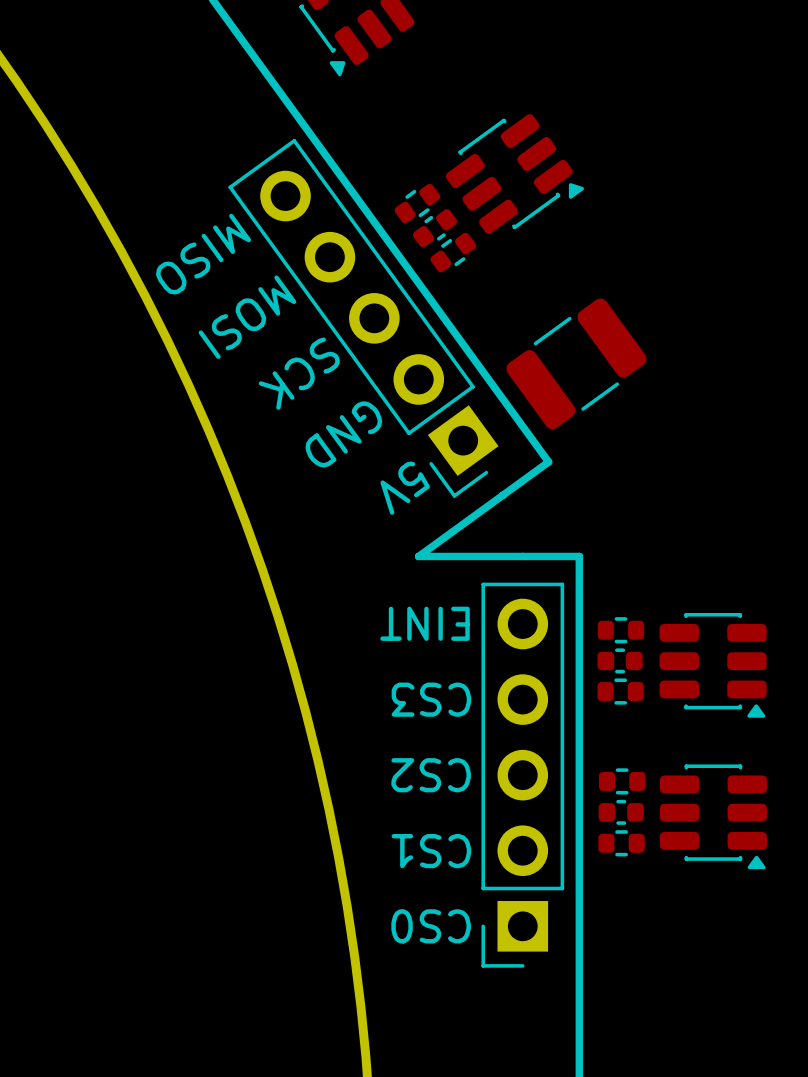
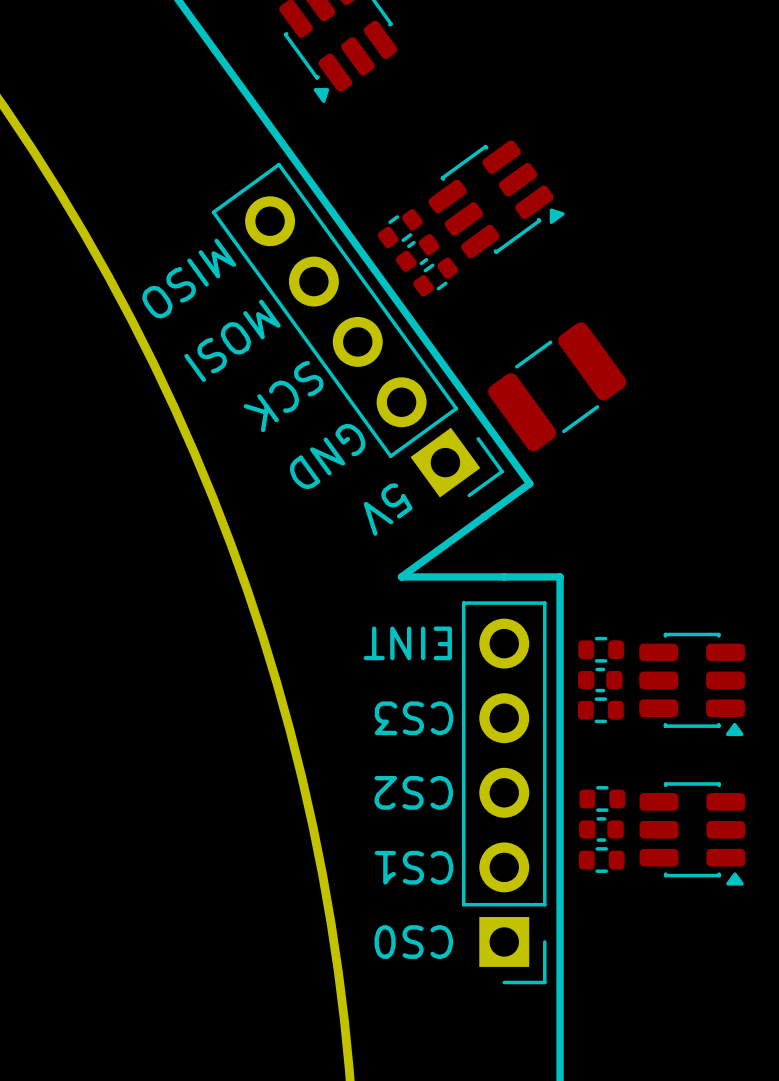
part footprint: [228, 138, 499, 498] -> [211, 162, 504, 498]
part footprint: [481, 582, 565, 968] -> [461, 601, 547, 985]

